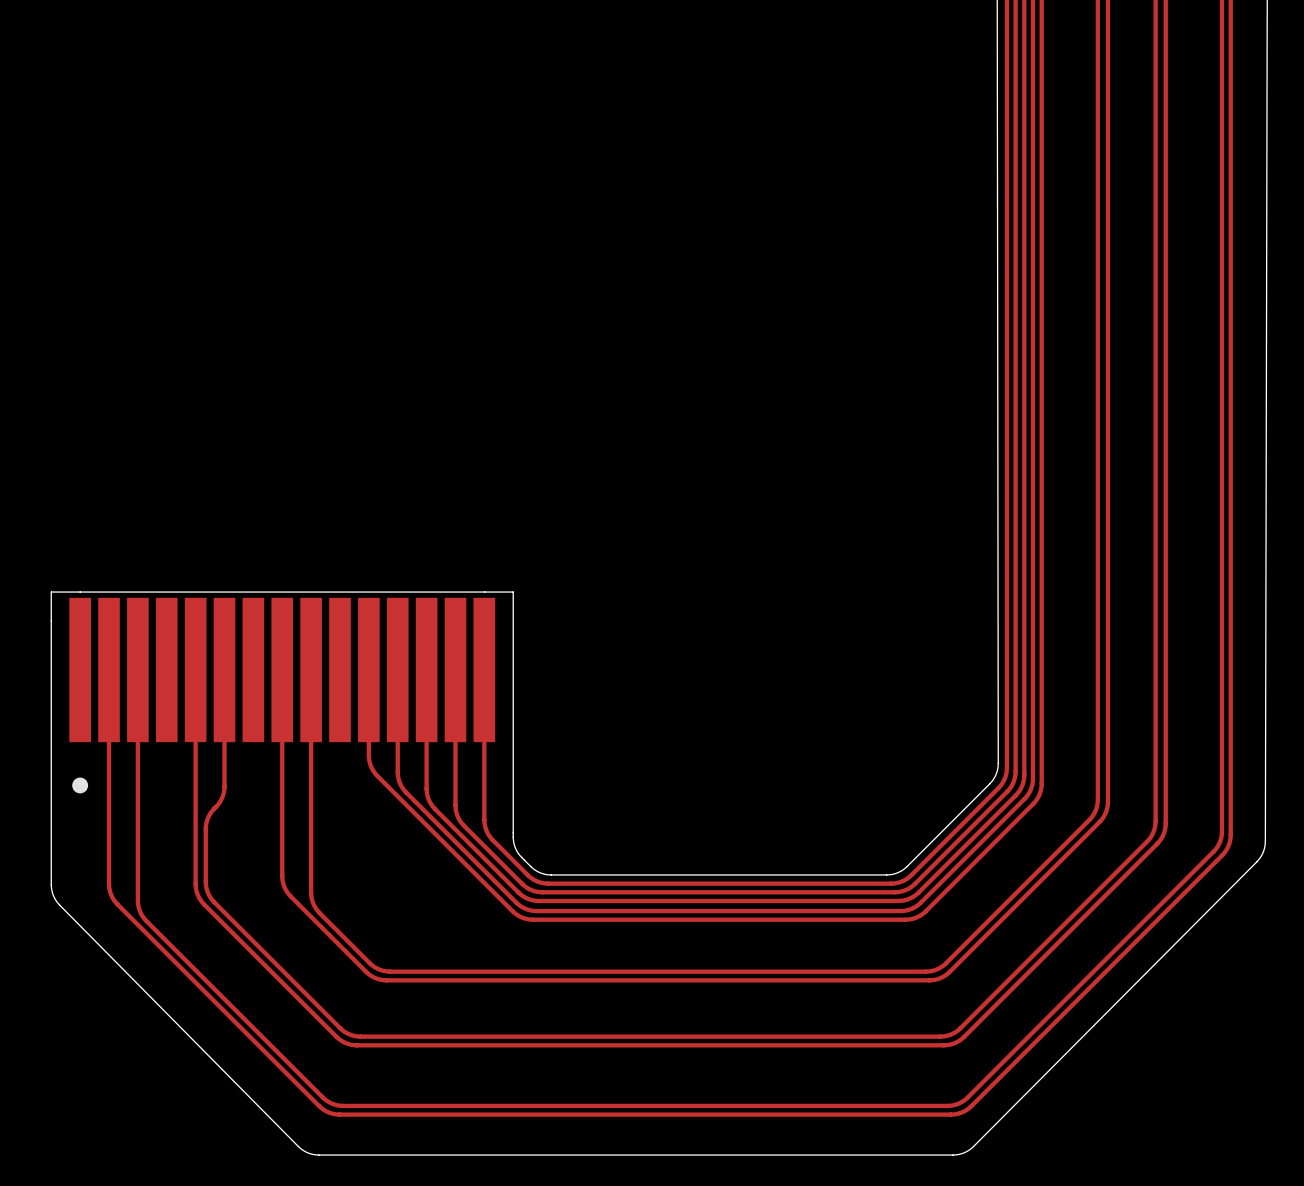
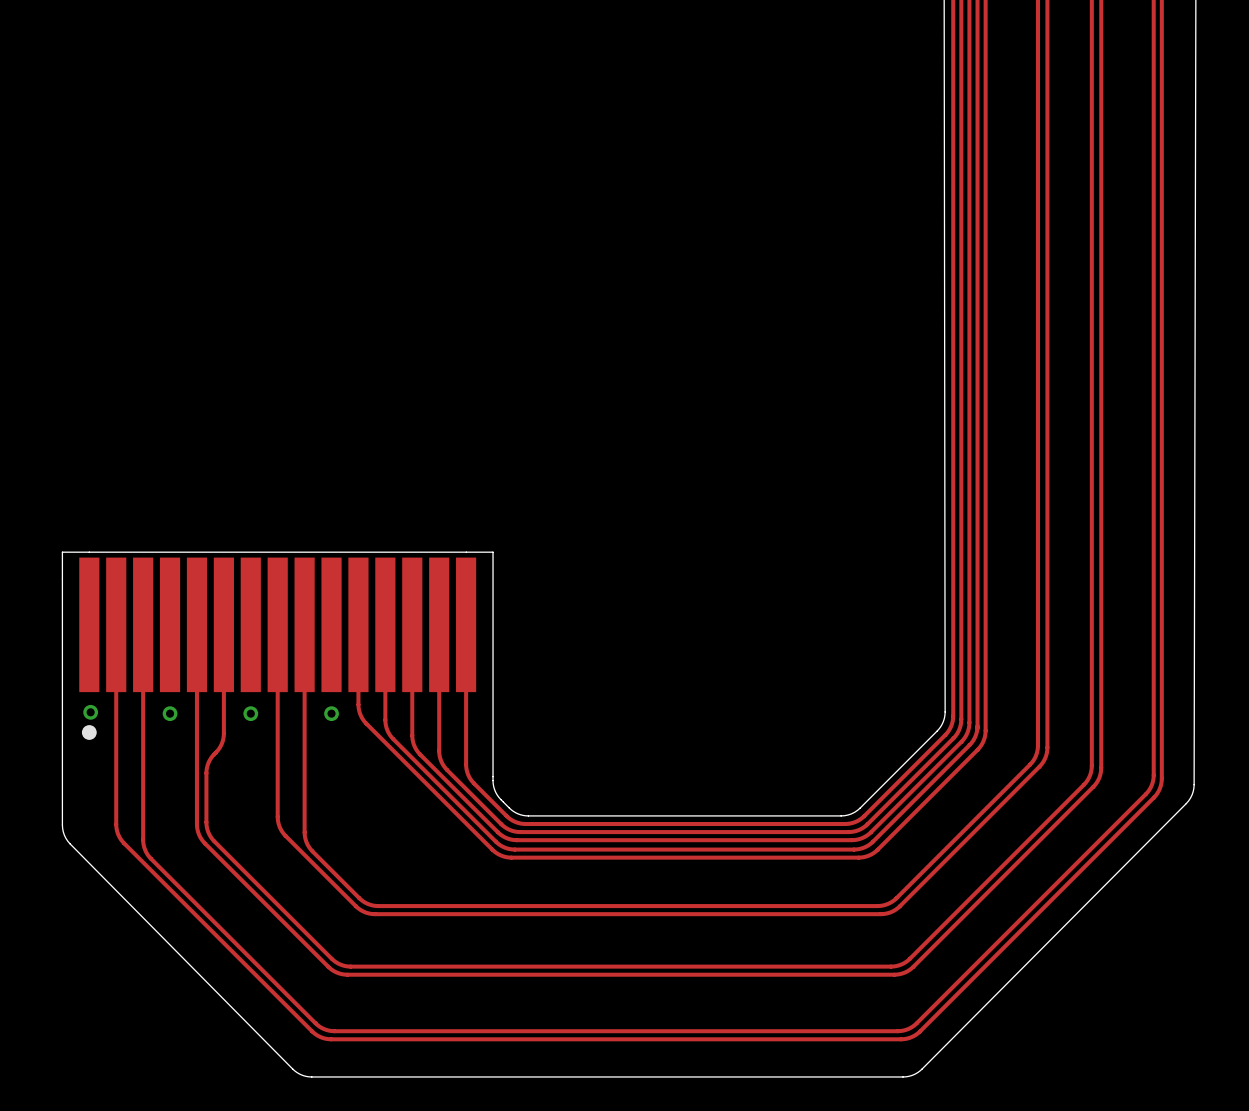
via: none -> (90, 712)
via: none -> (170, 713)
via: none -> (250, 713)
via: none -> (331, 713)

